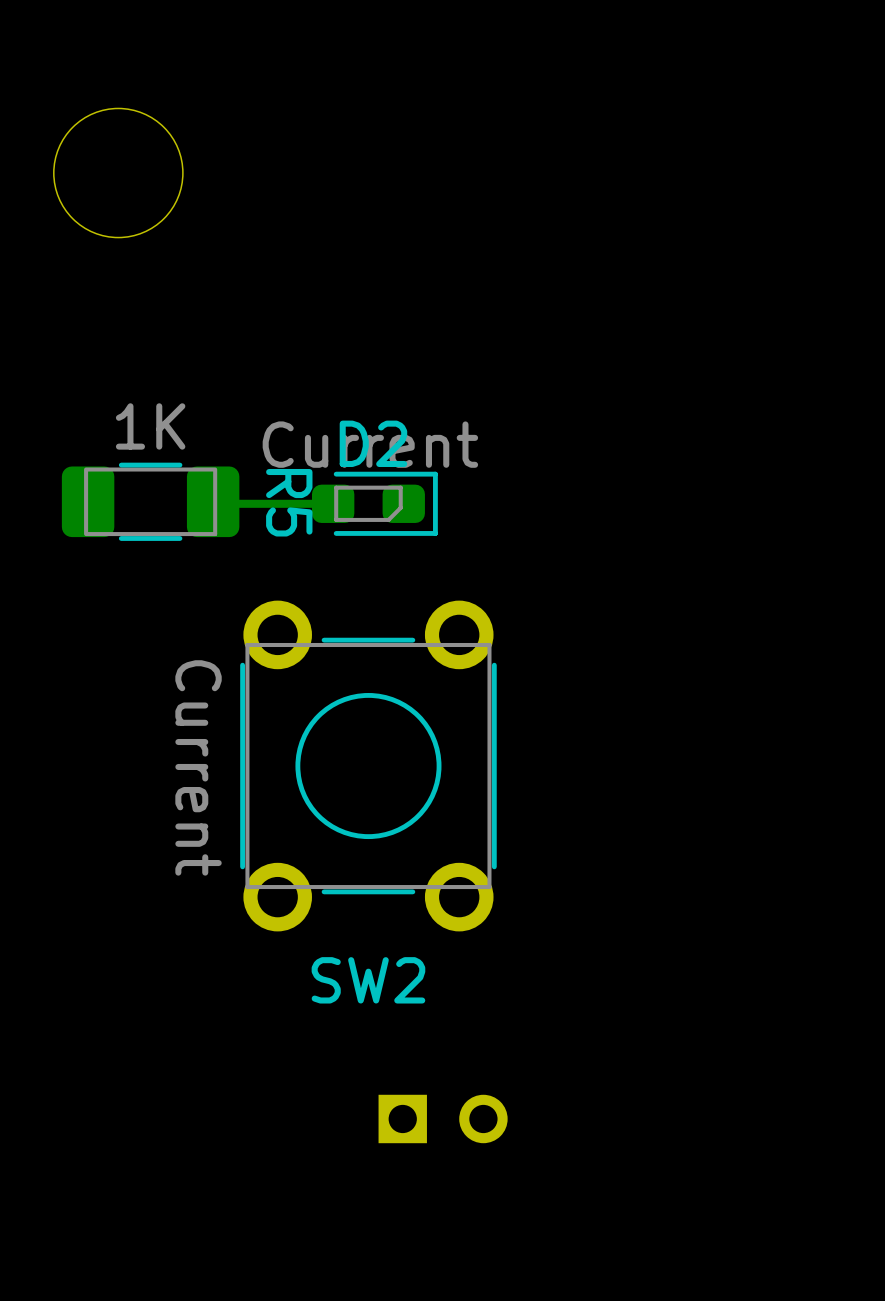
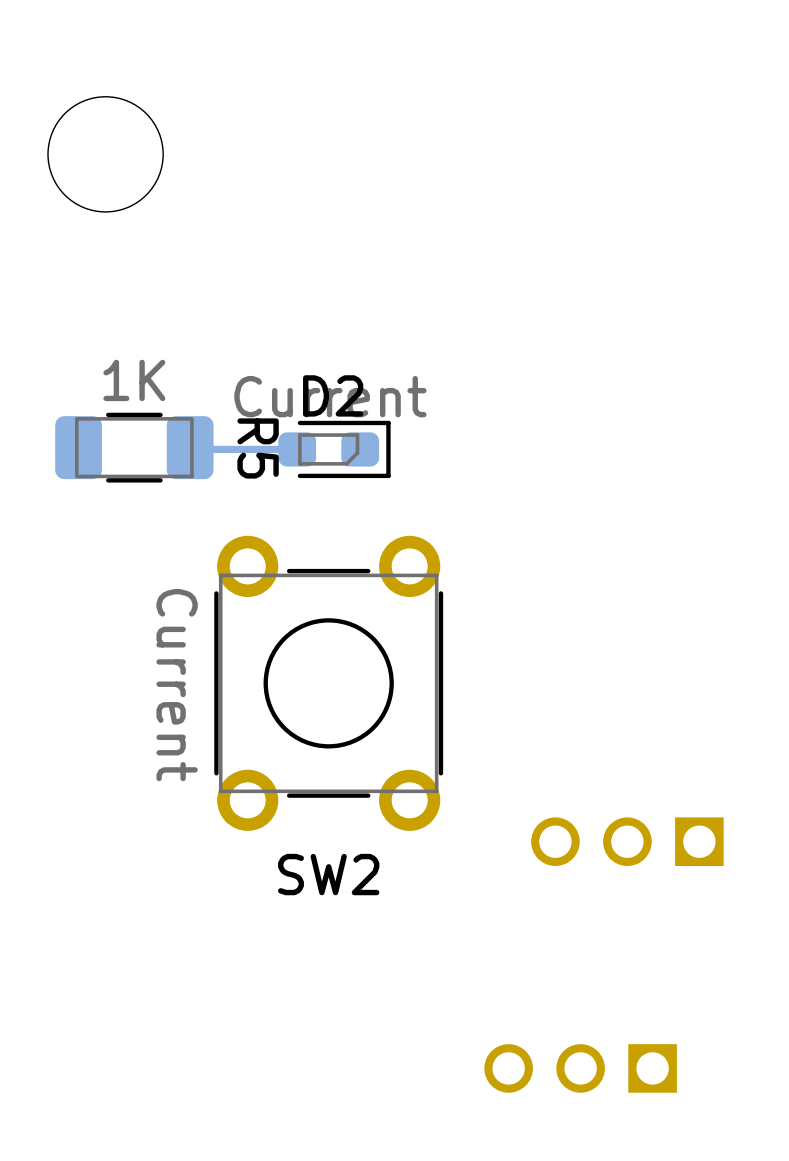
part: none -> (627, 841)
part: (443, 1118) -> none
part: none -> (580, 1068)

